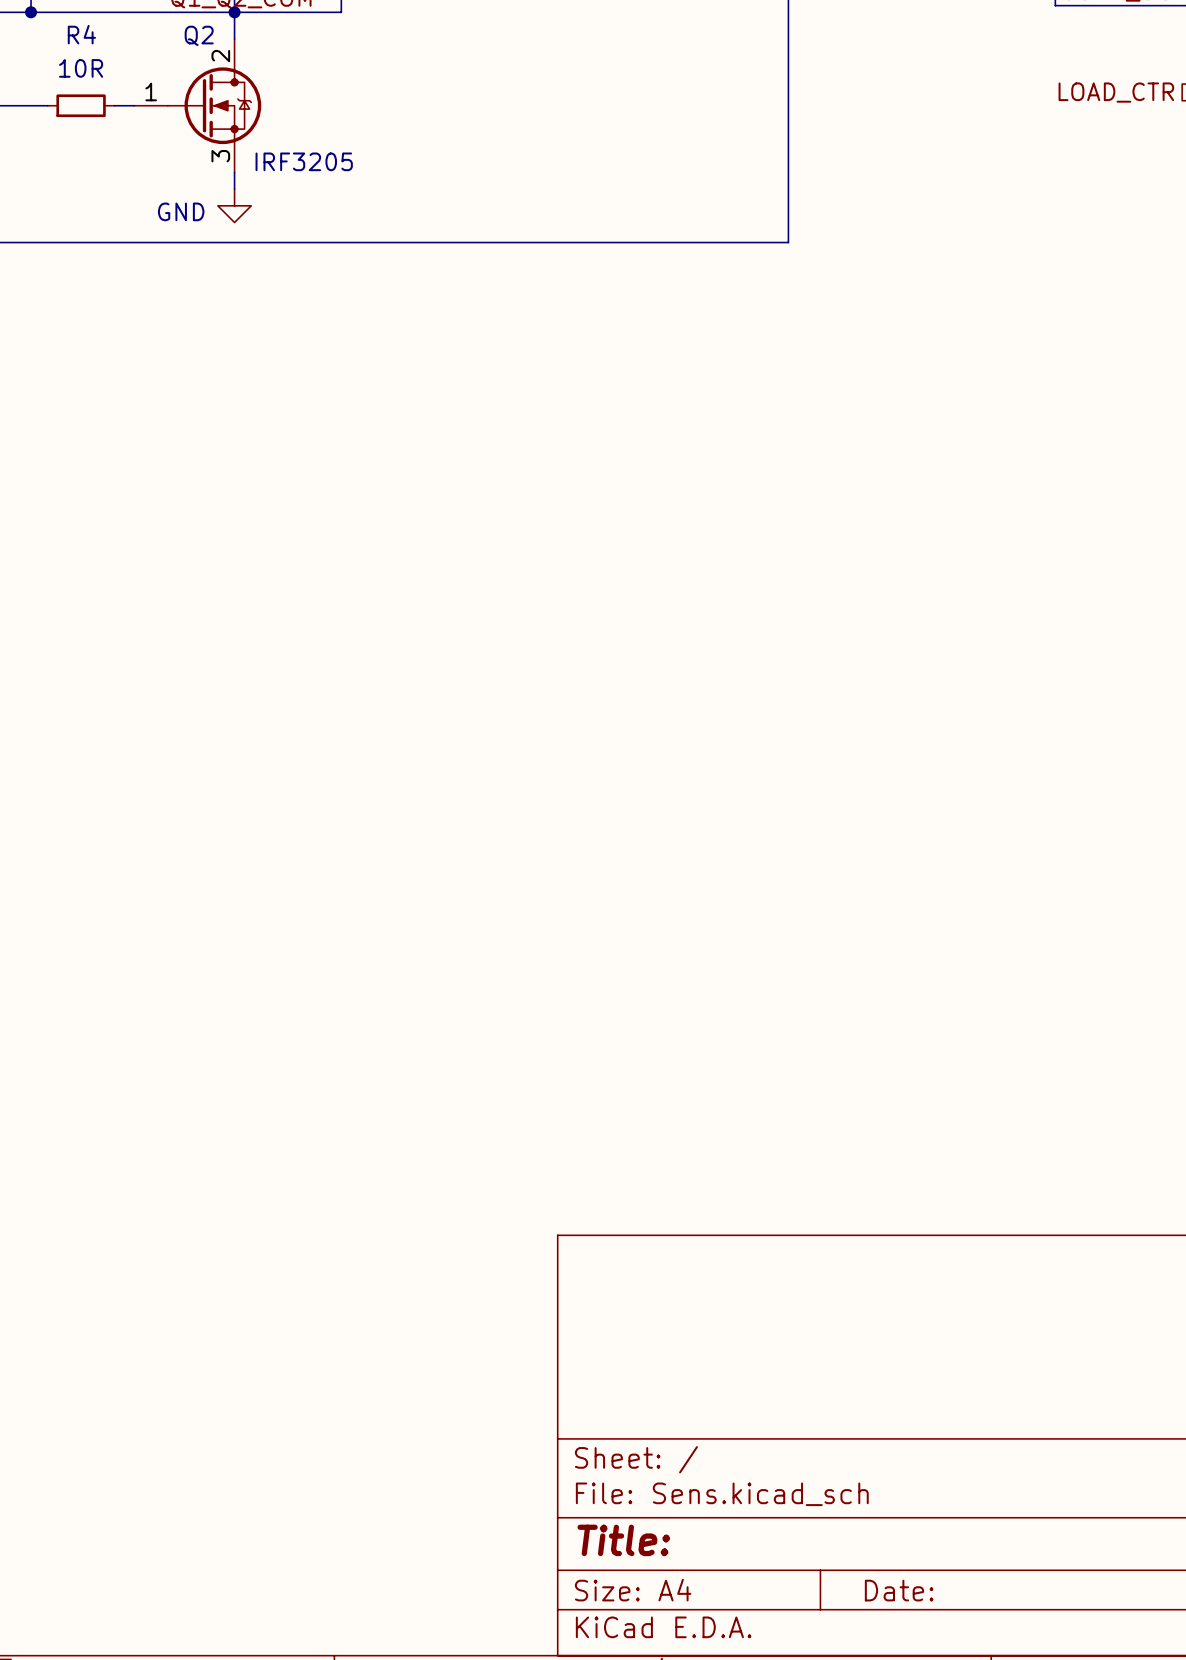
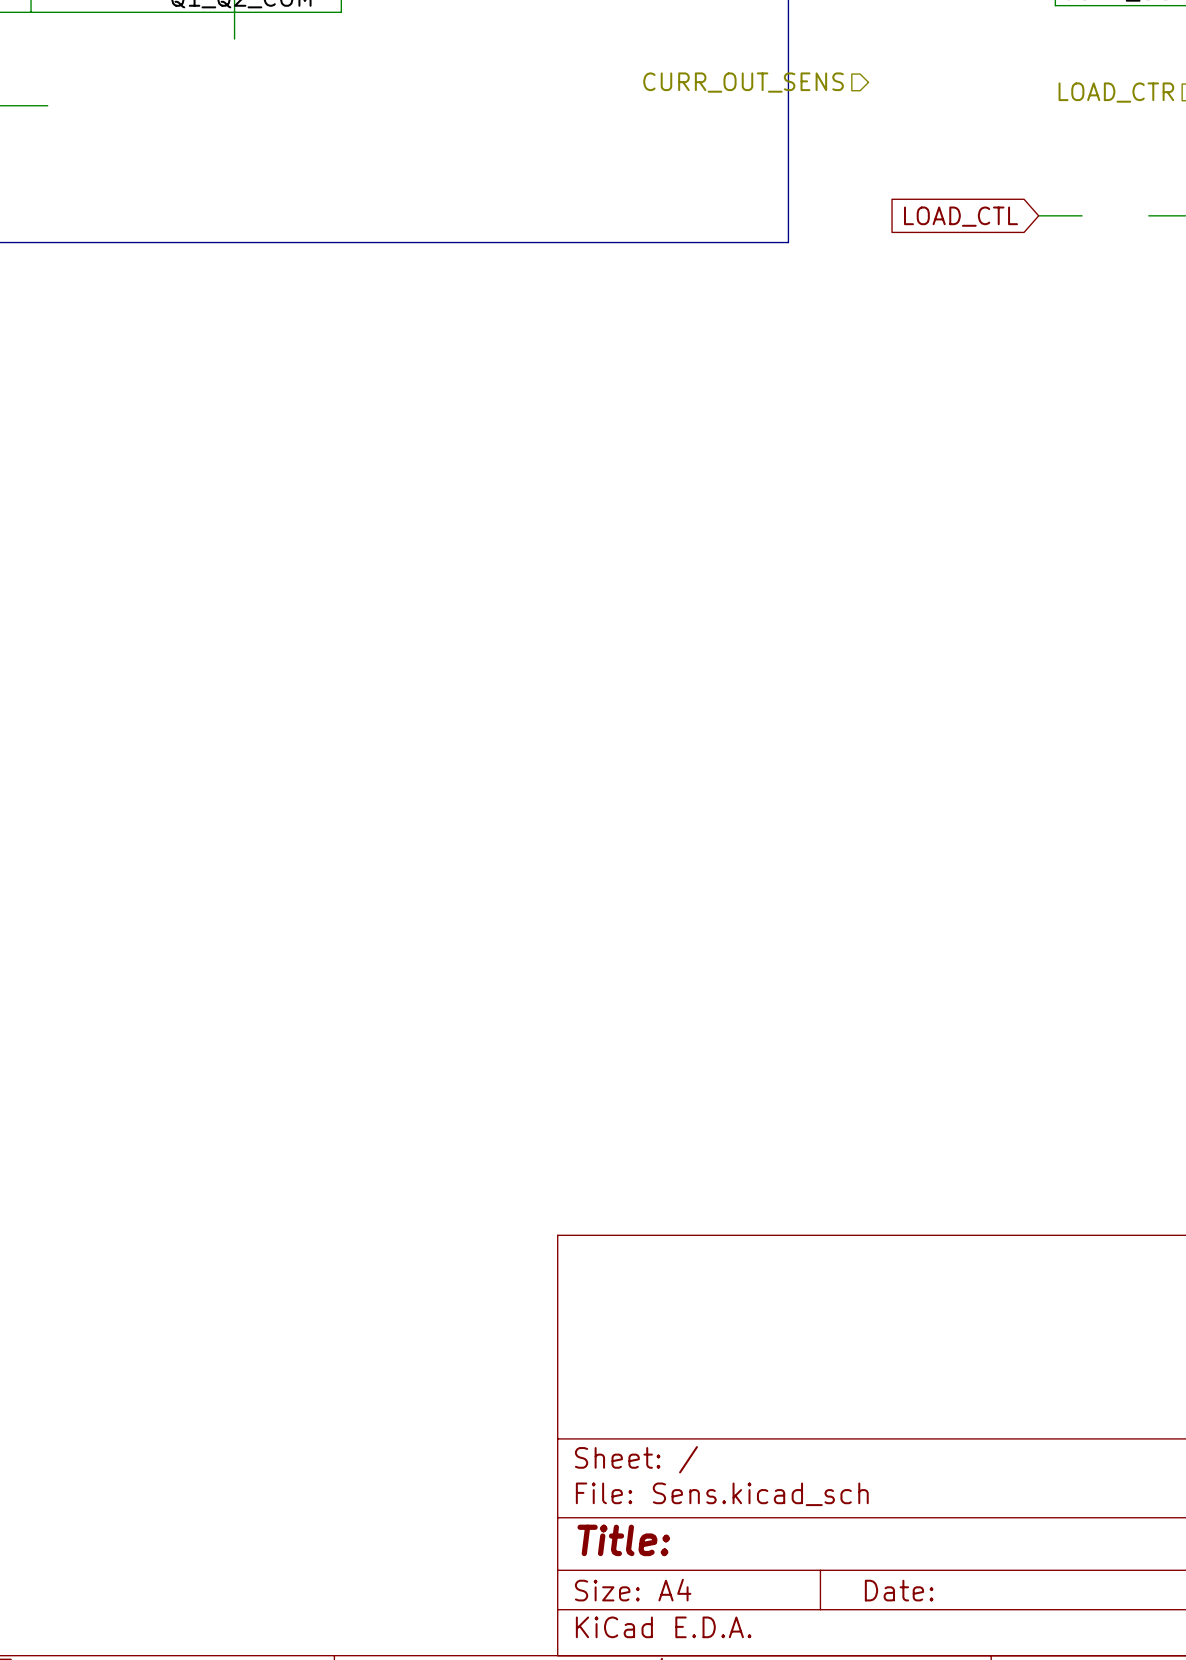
junction: (31, 12) -> none
junction: (234, 12) -> none
hierarchical label: none -> CURR_OUT_SENS (743, 82)
R4: 10R (81, 105) -> none
wire: (114, 105) (134, 105) -> none
Q2: IRF3205 (197, 105) -> none
wire: (234, 172) (234, 189) -> none
power symbol: GND (234, 205) -> none
wire: none -> (1038, 215) (1082, 215)
wire: none -> (1148, 215) (1185, 215)
global label: none -> LOAD_CTL (960, 216)

